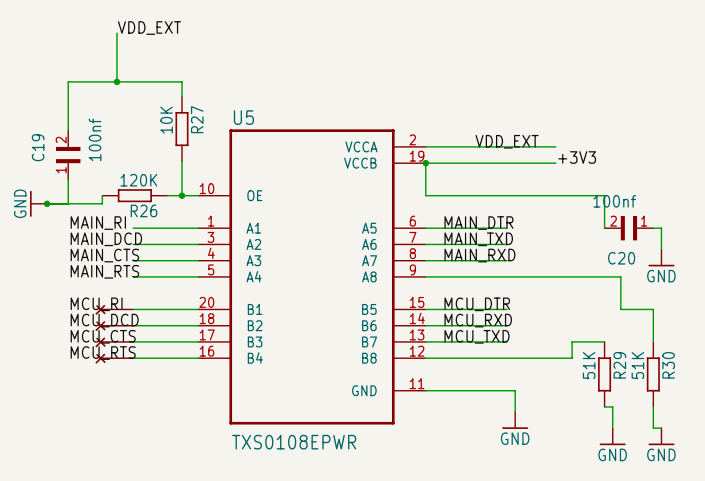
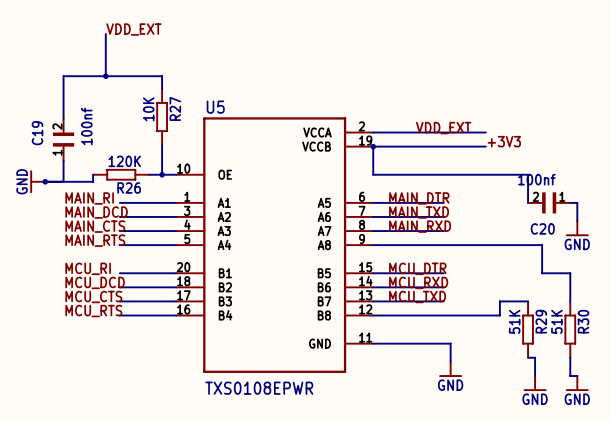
part: (114, 309) -> none
part: (114, 326) -> none
part: (114, 342) -> none
part: (114, 358) -> none

